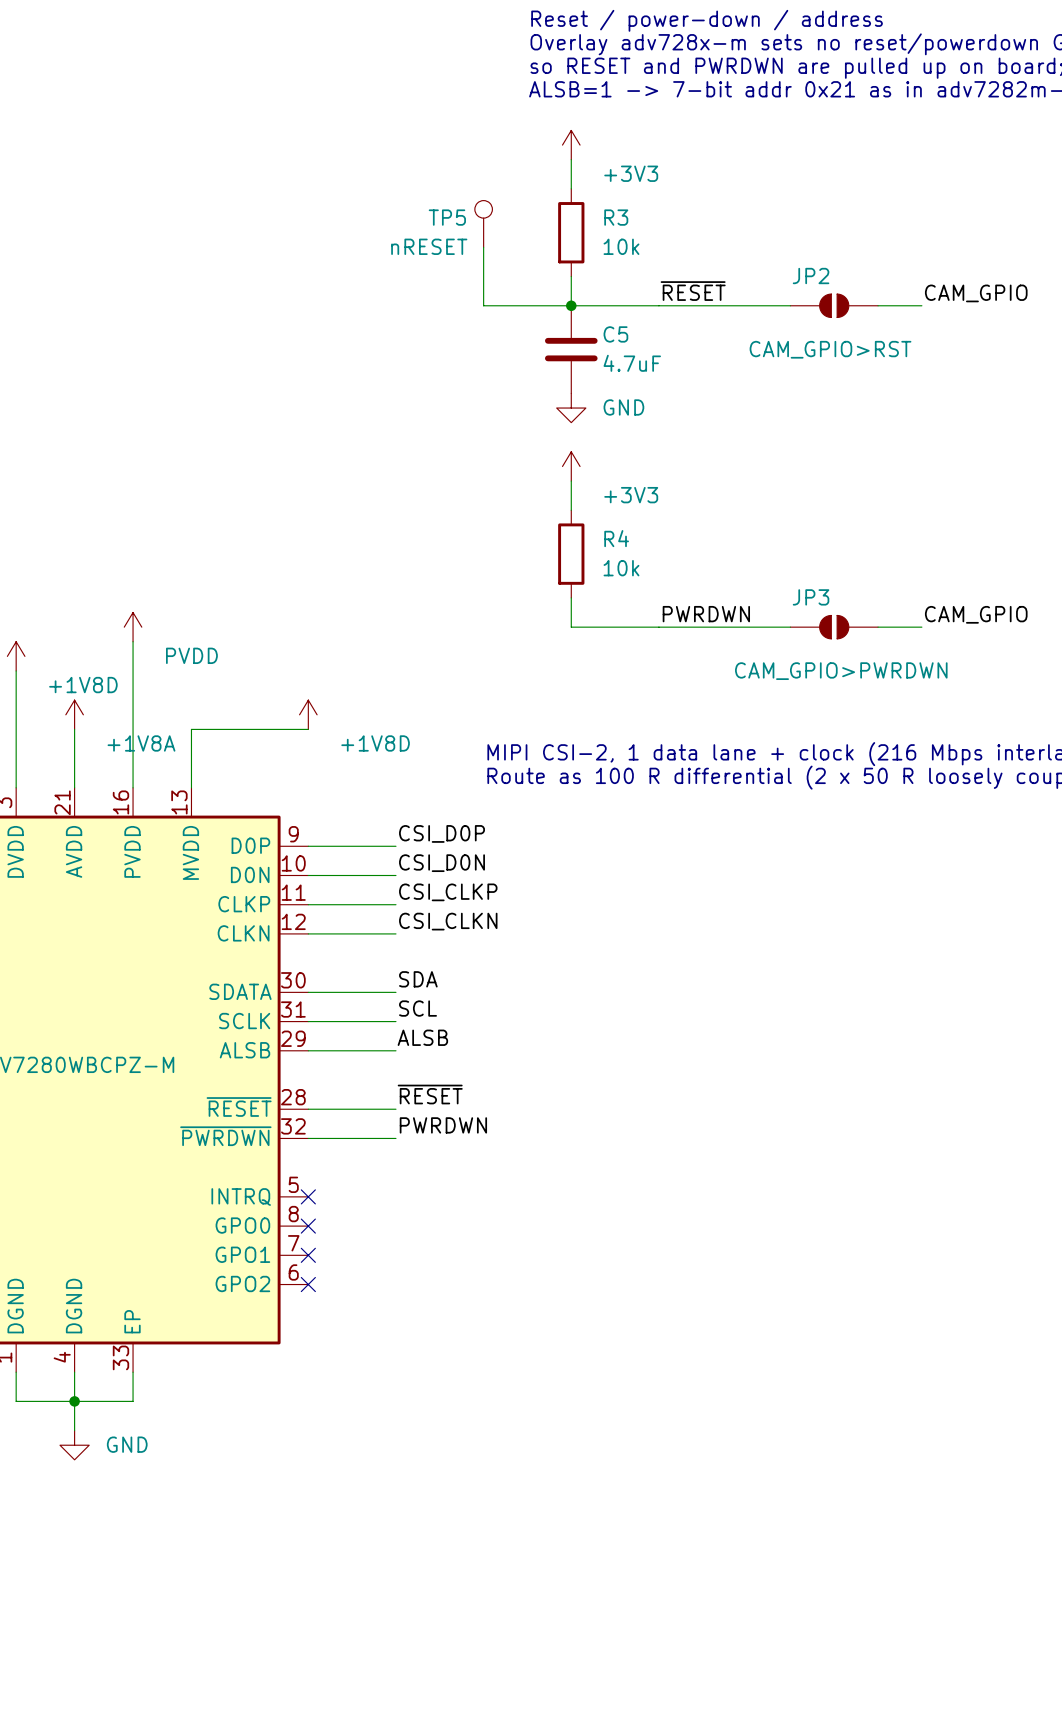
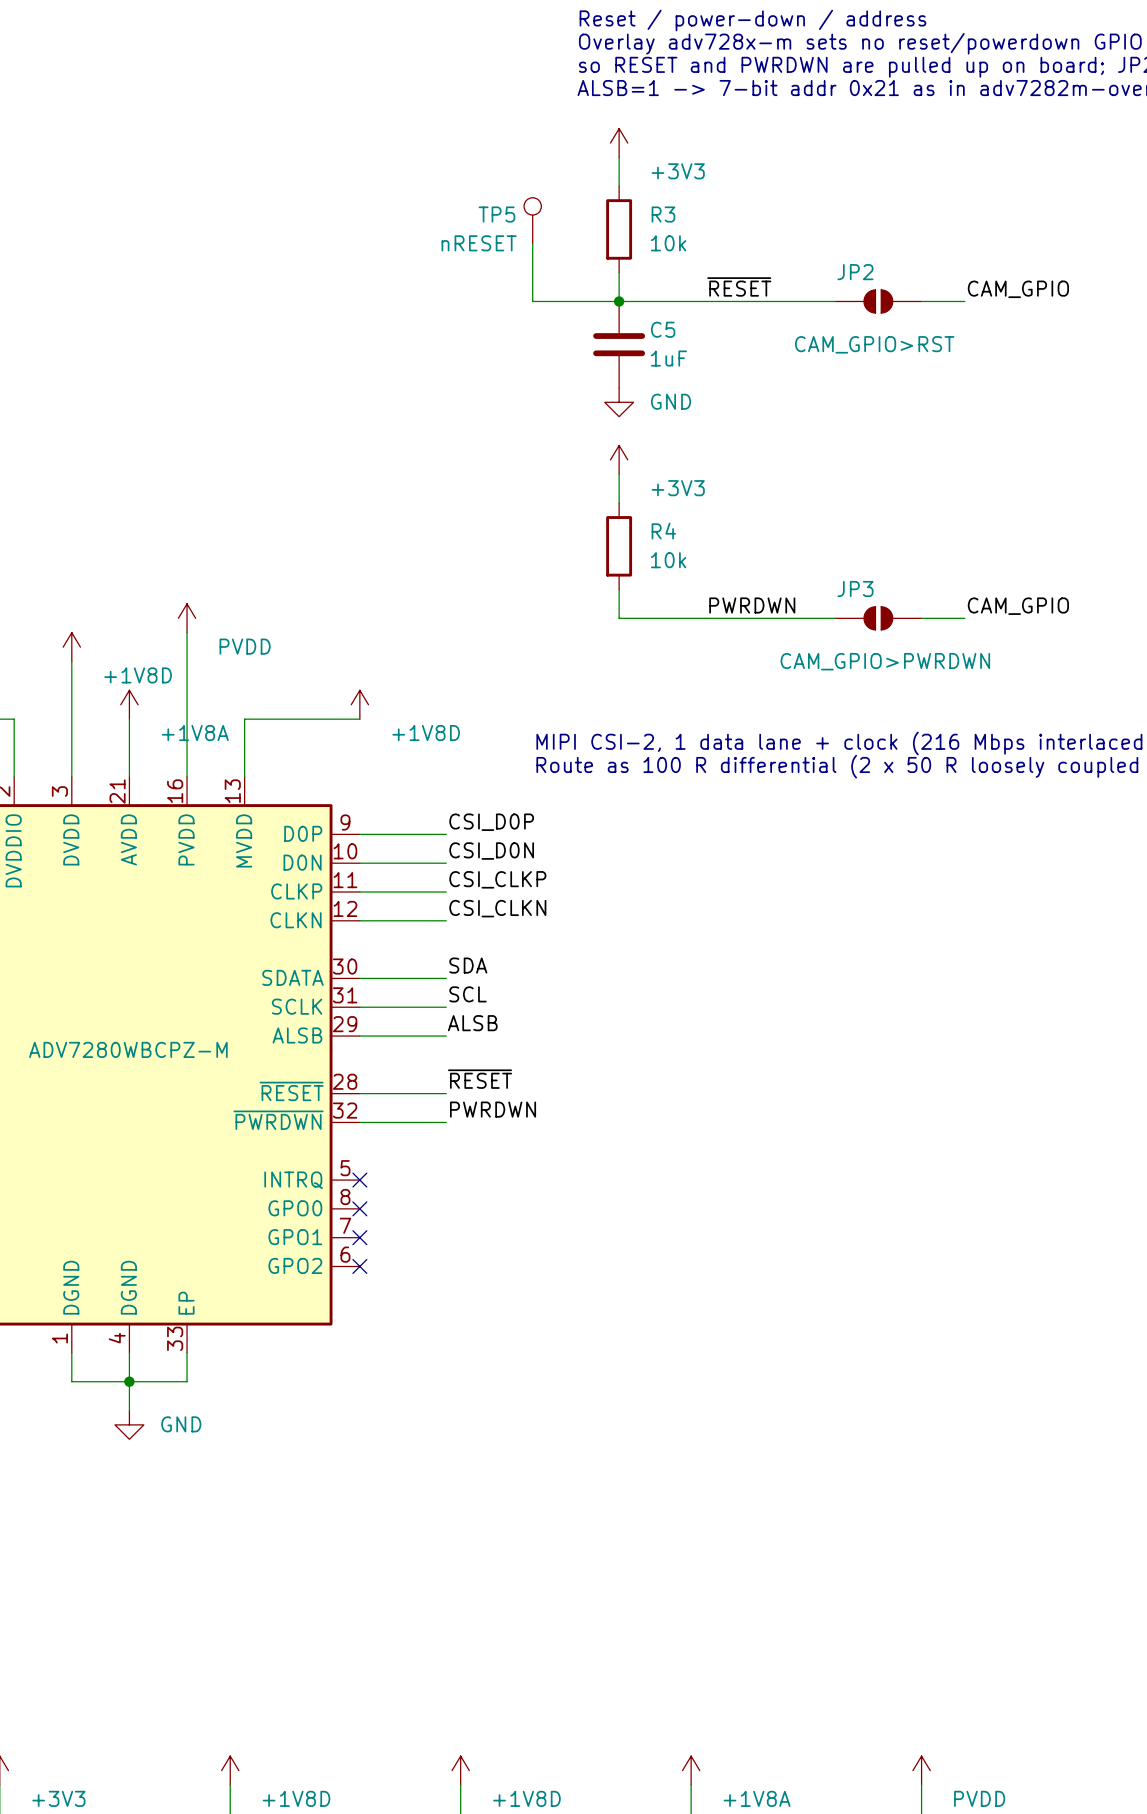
C5 value: 4.7uF (632, 363) -> 1uF (668, 358)

